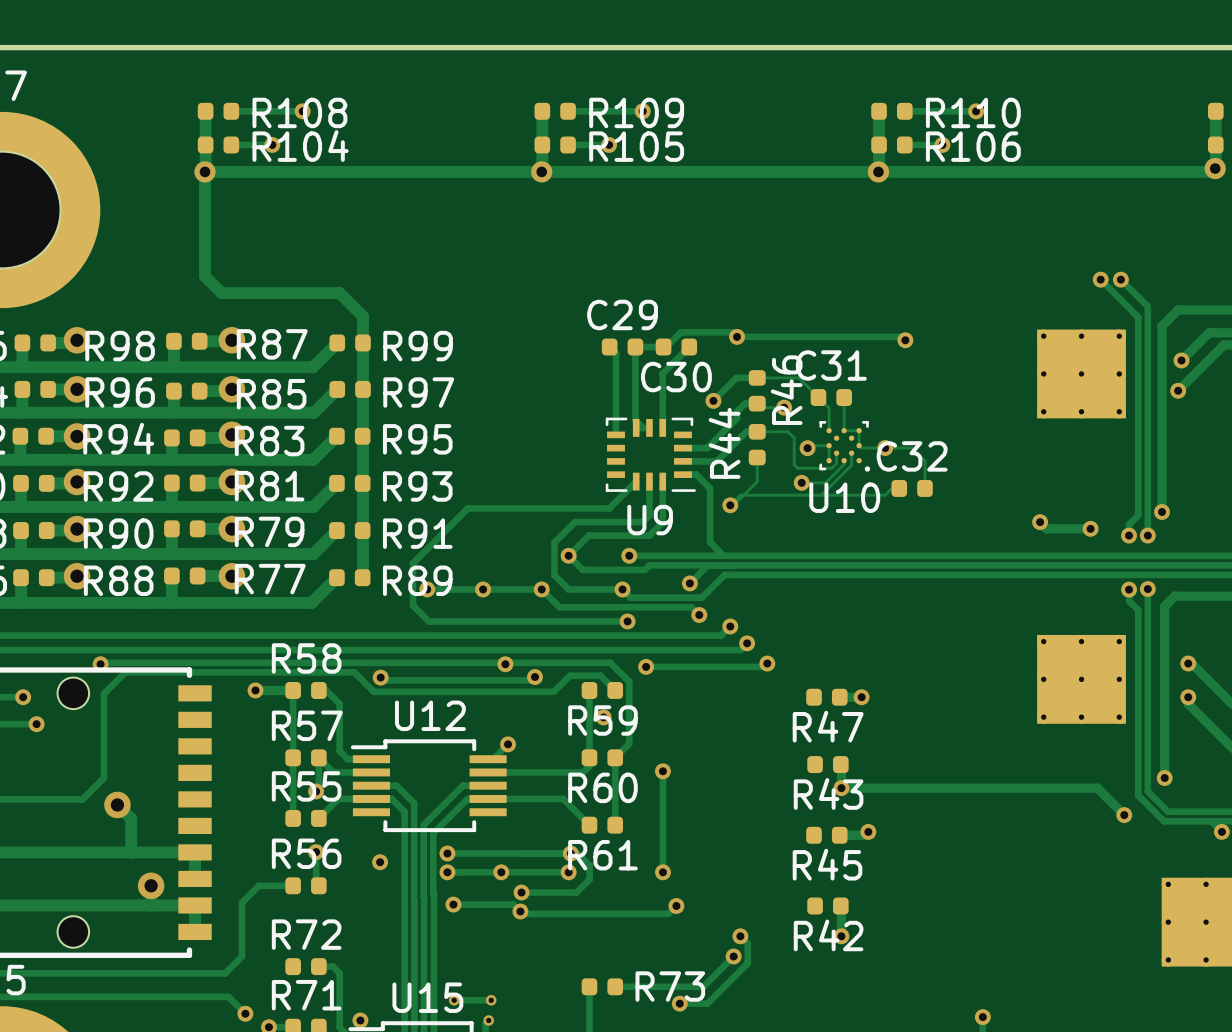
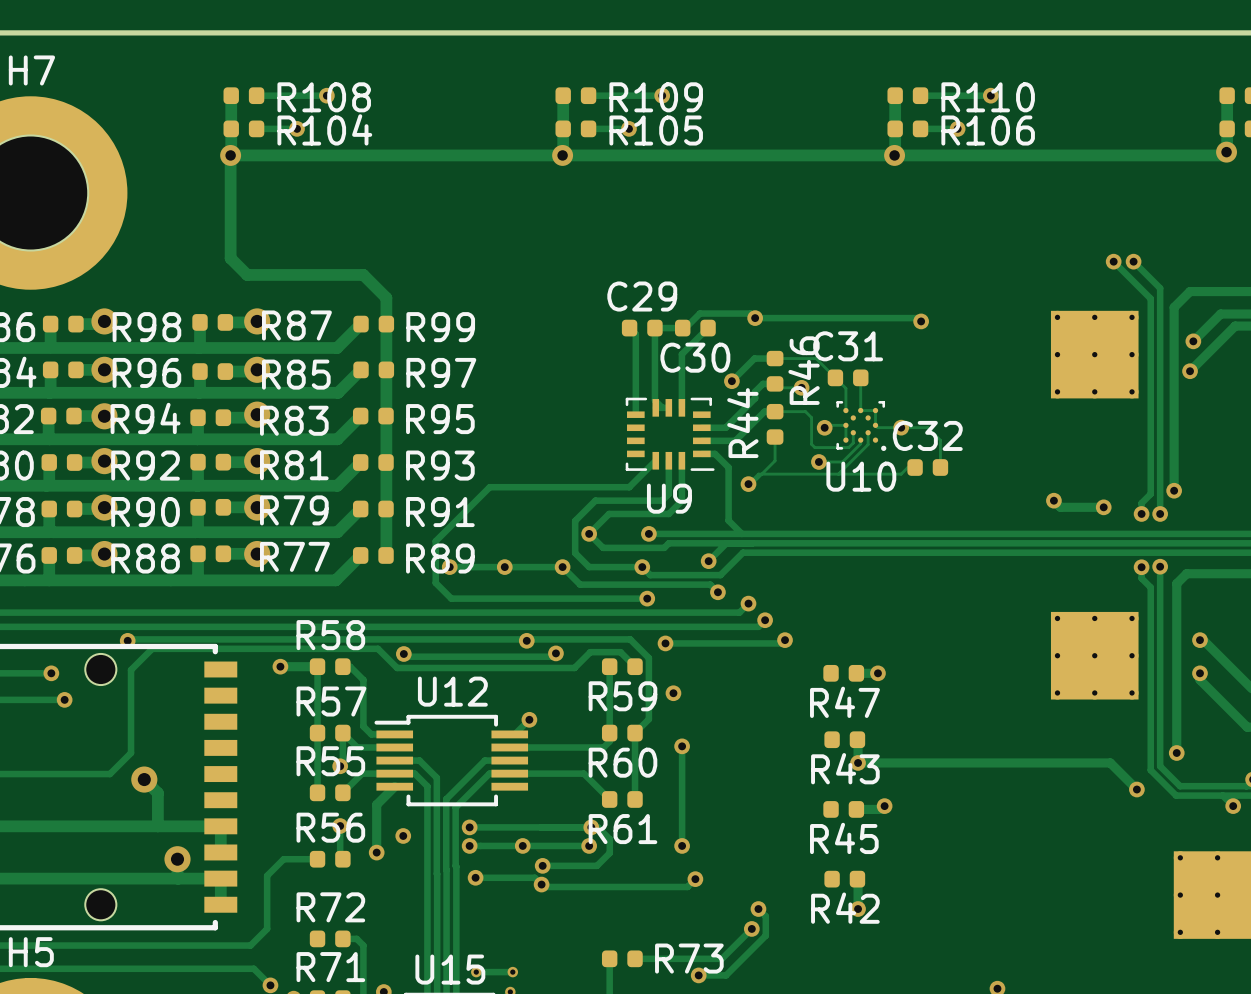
via position: (603, 717) -> (673, 693)
track: none -> (394, 786) (376, 804) (376, 852)
via: none -> (376, 852)

